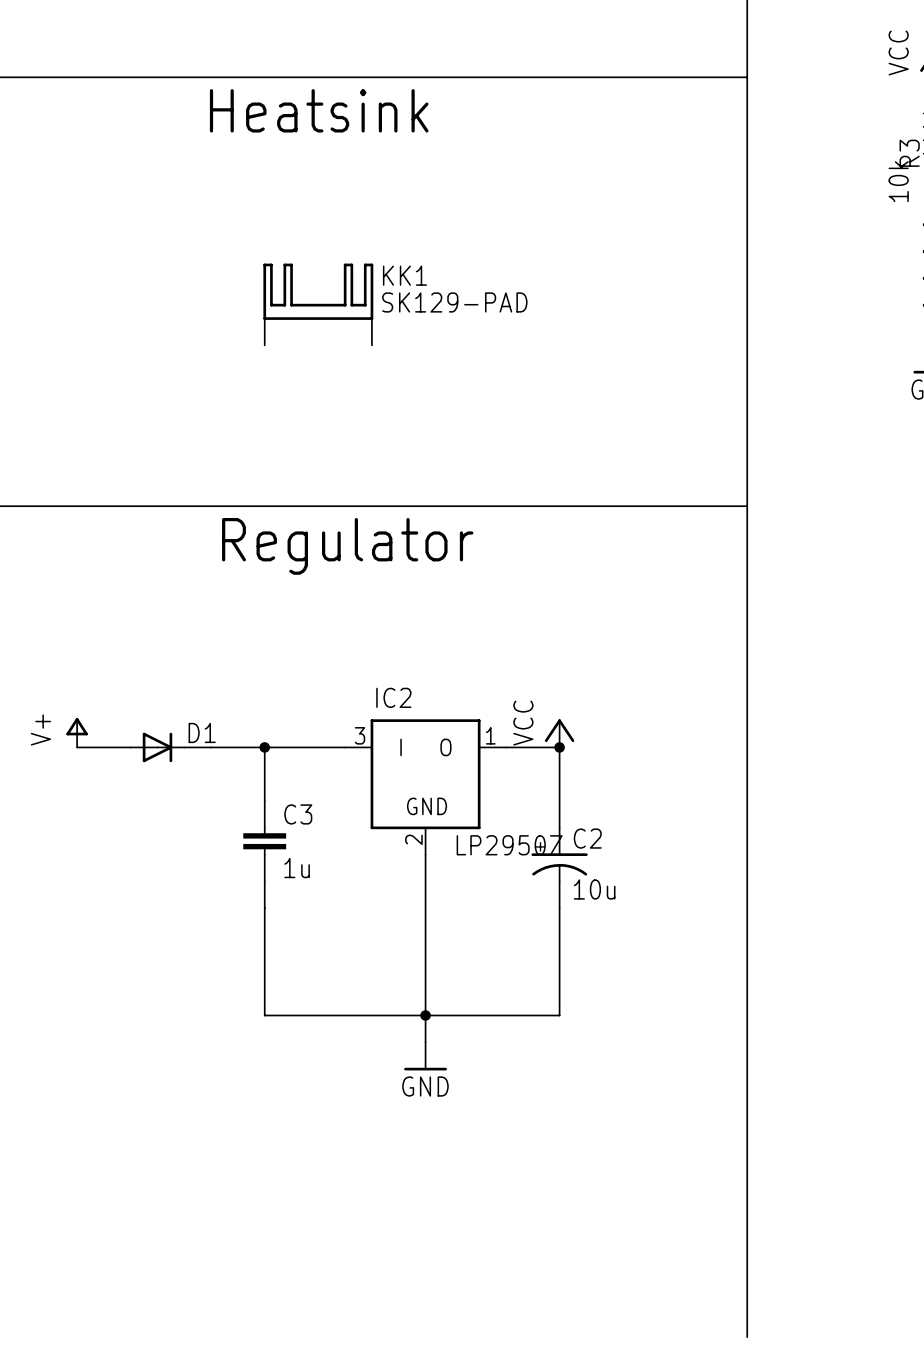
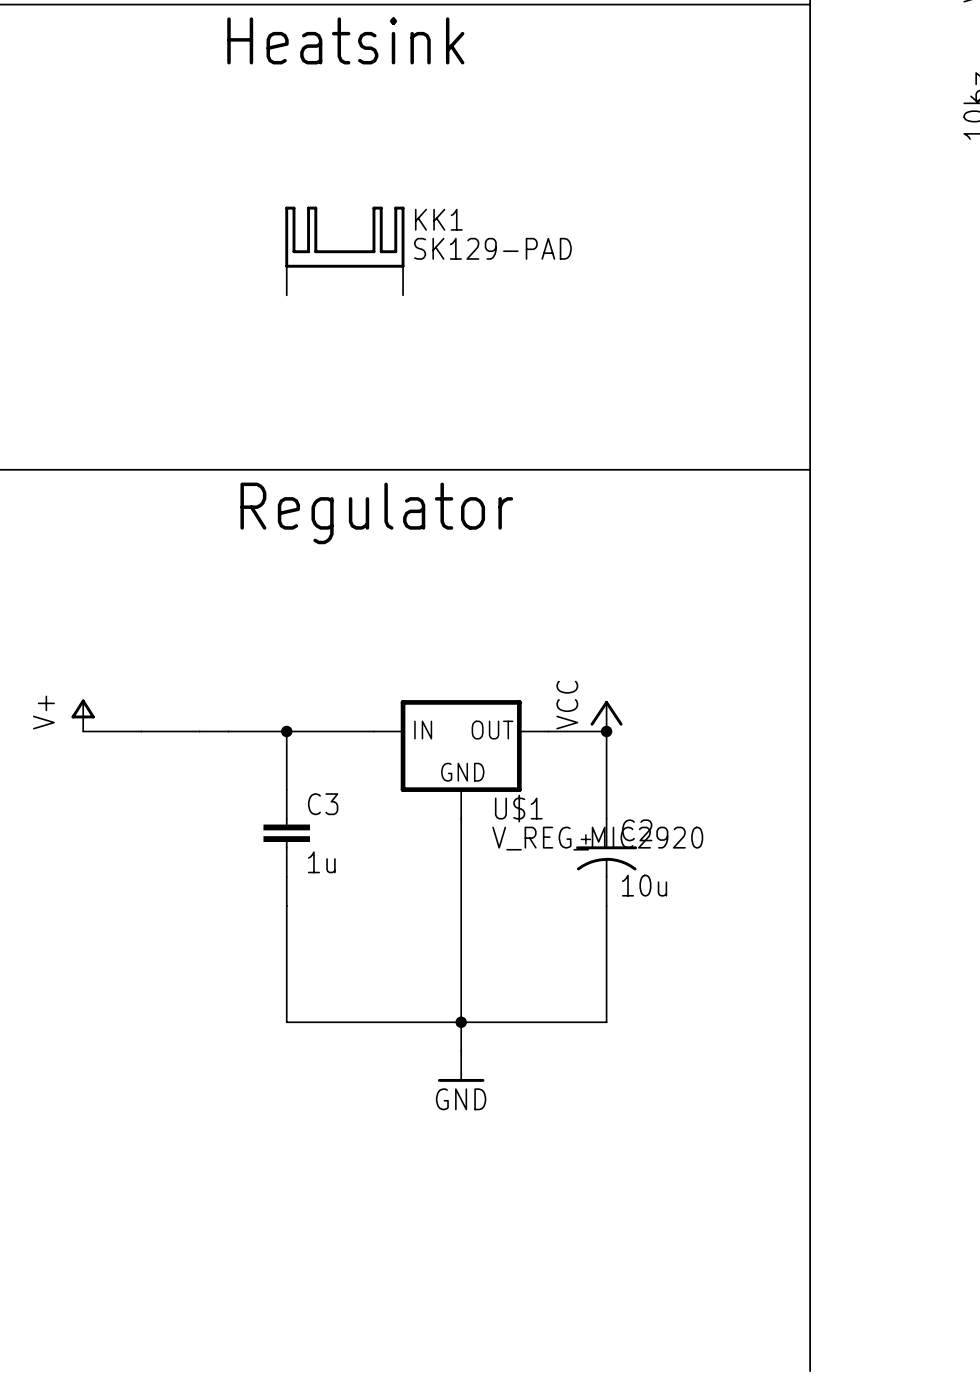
D1: (157, 747) -> none
U$1: none -> V_REG_MIC2920 (461, 759)
IC2: LP2950Z (425, 786) -> none

